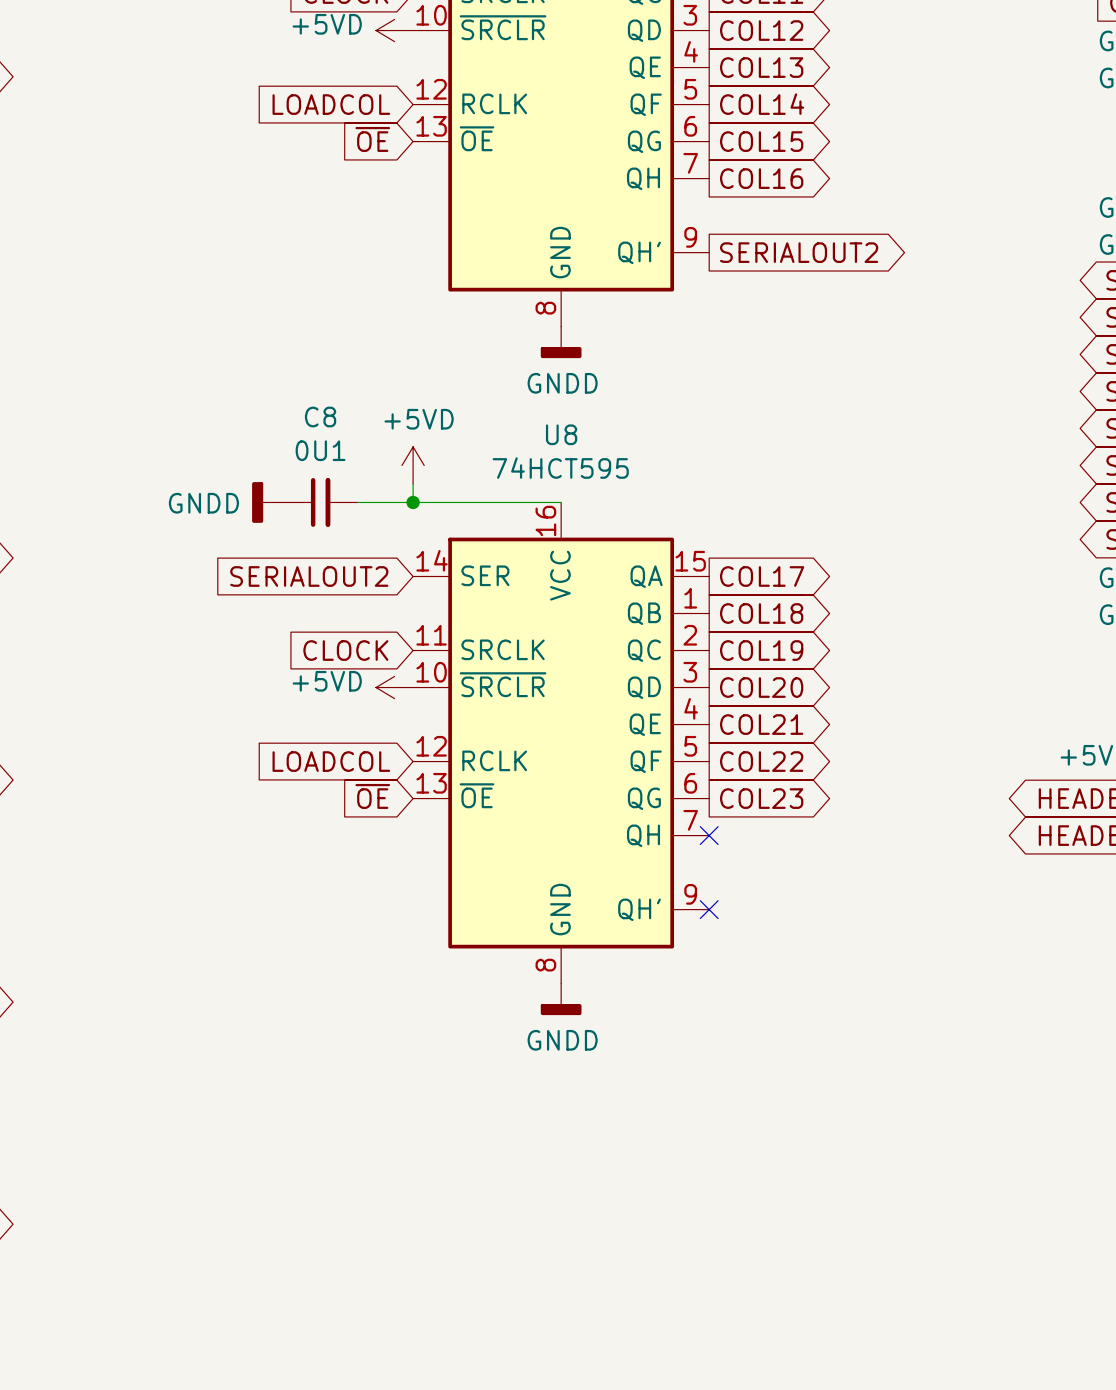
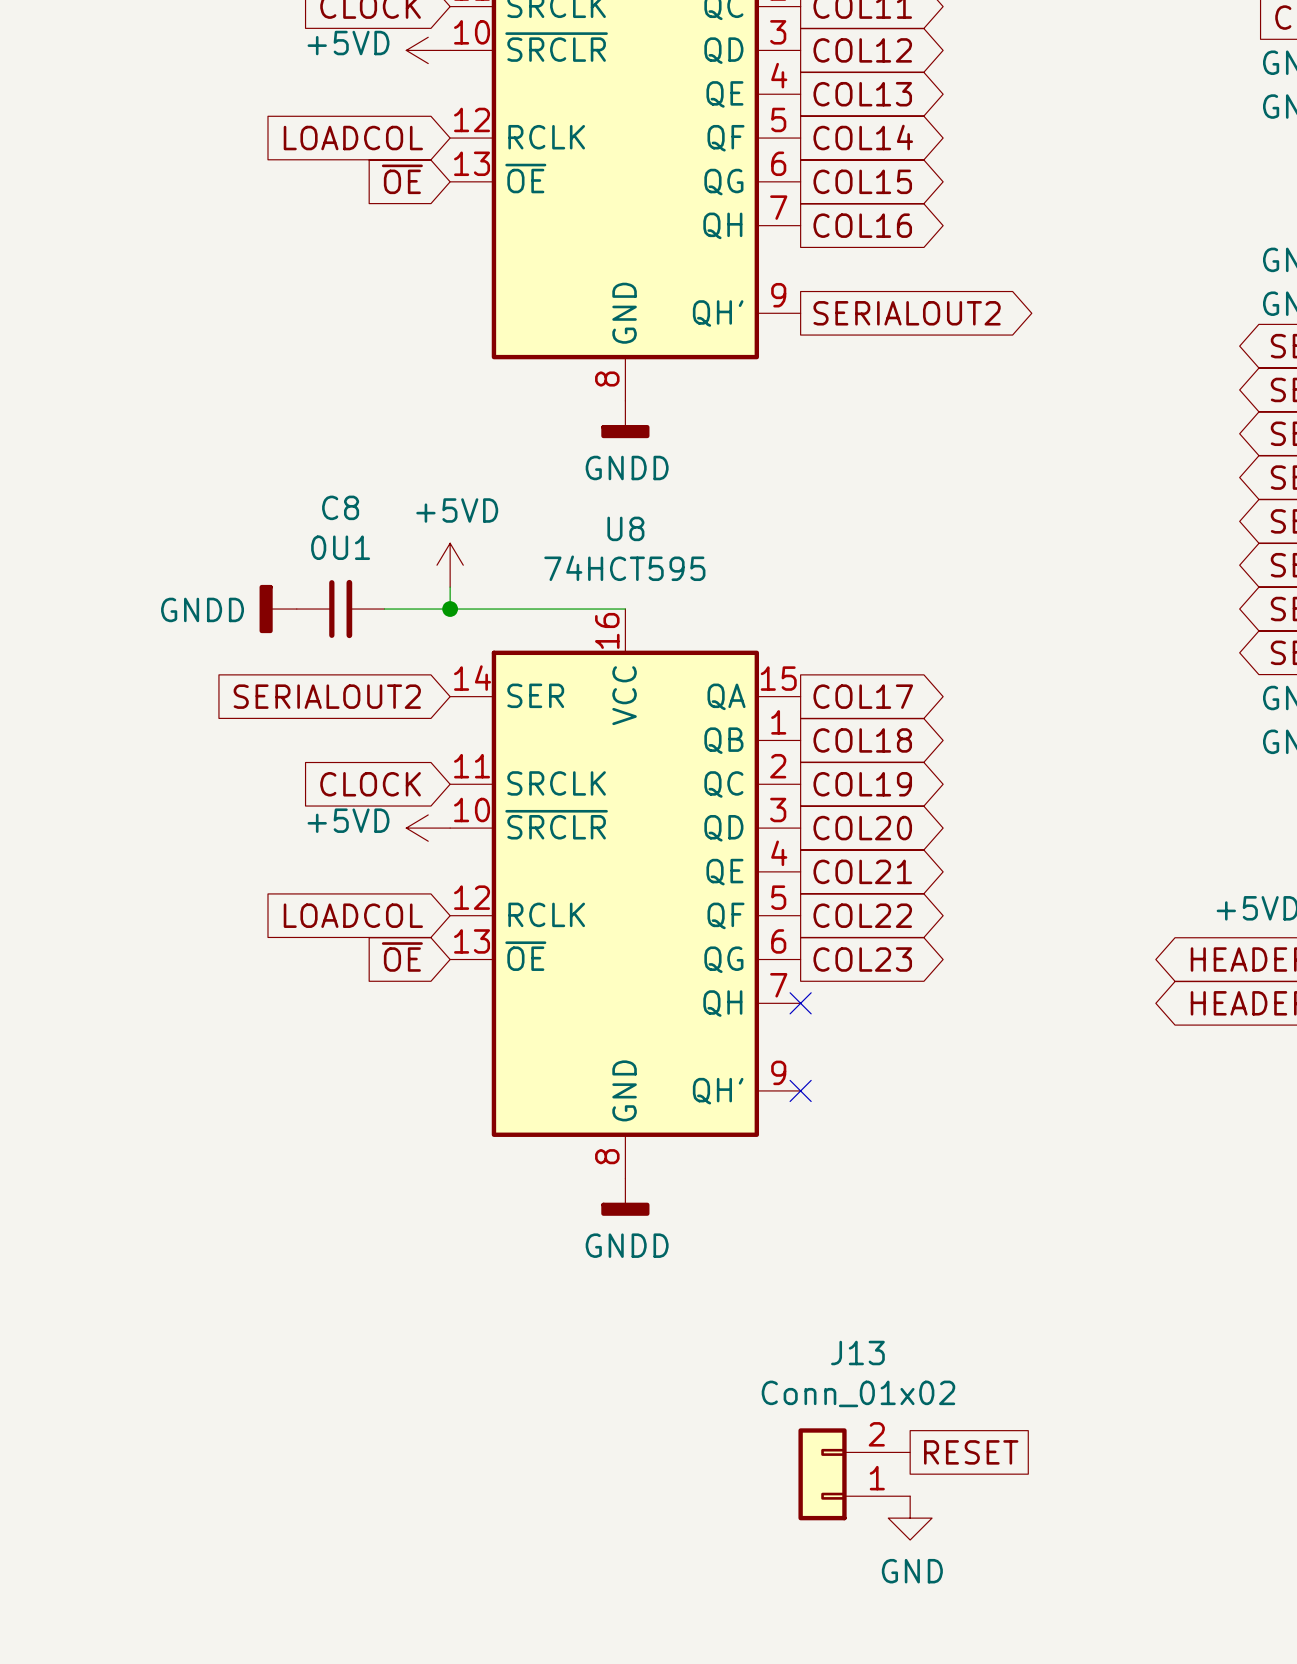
global label: none -> RESET (971, 1452)
J13: none -> Conn_01x02 (854, 1474)
power symbol: none -> GND (910, 1518)

